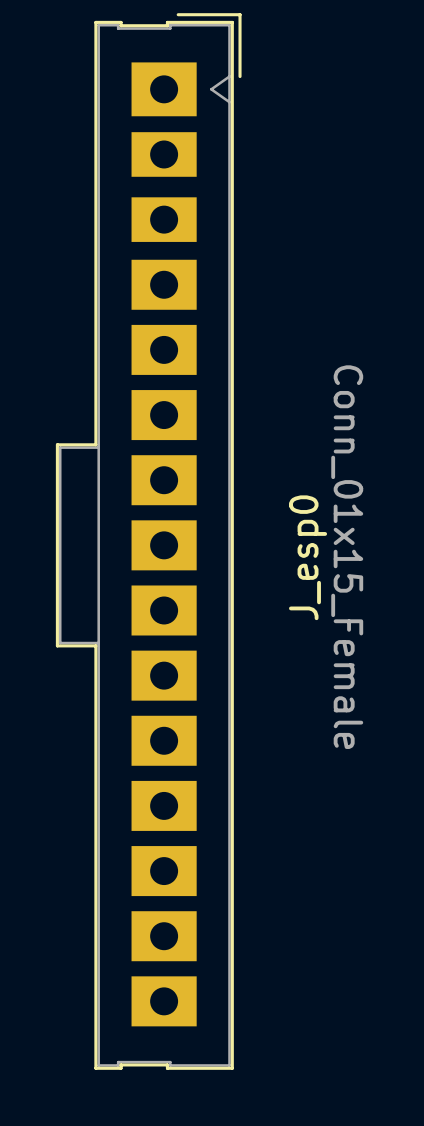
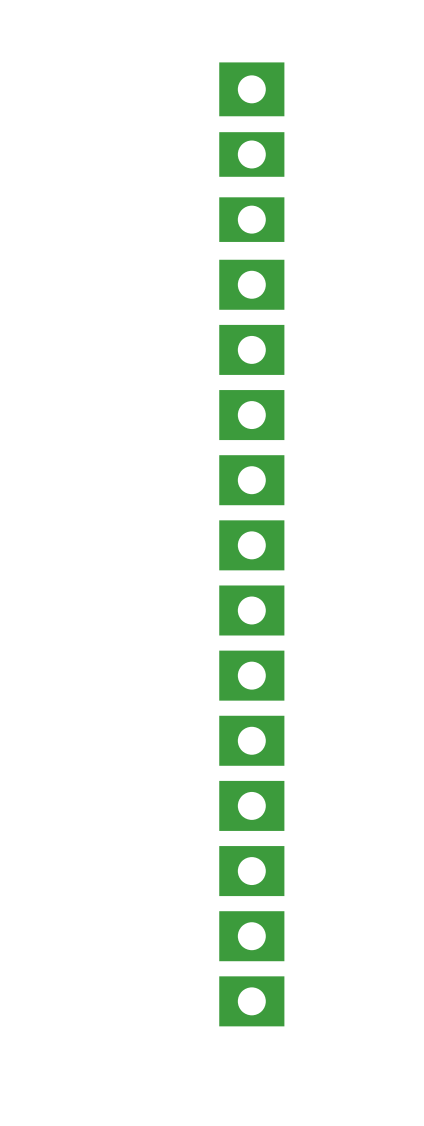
J_esp0 side: top (148, 541) -> bottom (251, 544)

